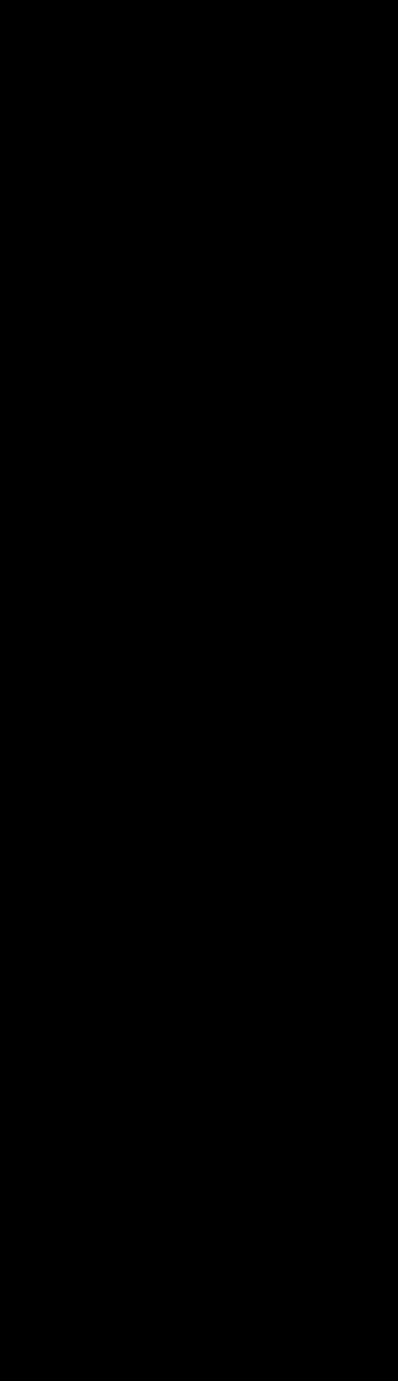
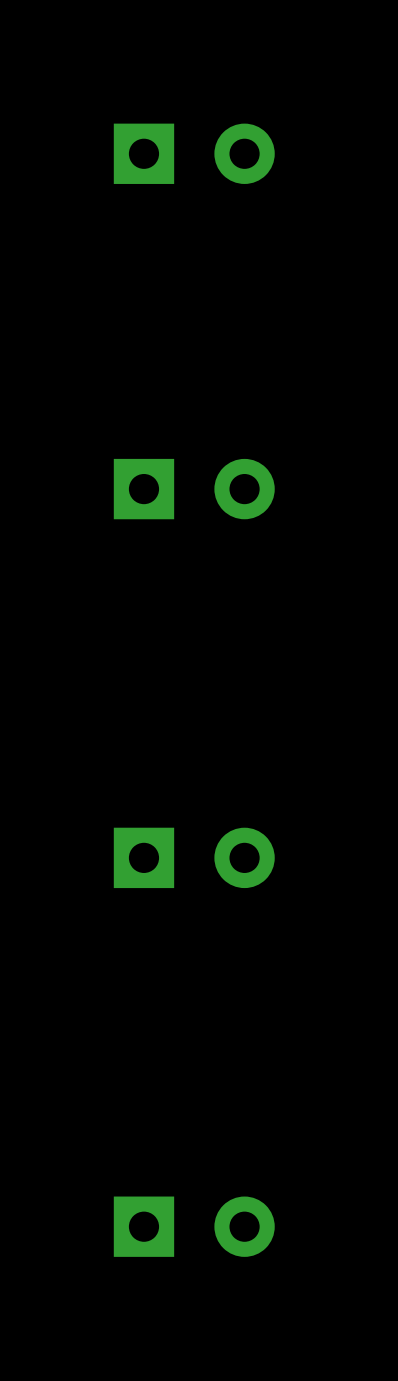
part: none -> (194, 153)
part: none -> (194, 489)
part: none -> (194, 857)
part: none -> (194, 1226)

